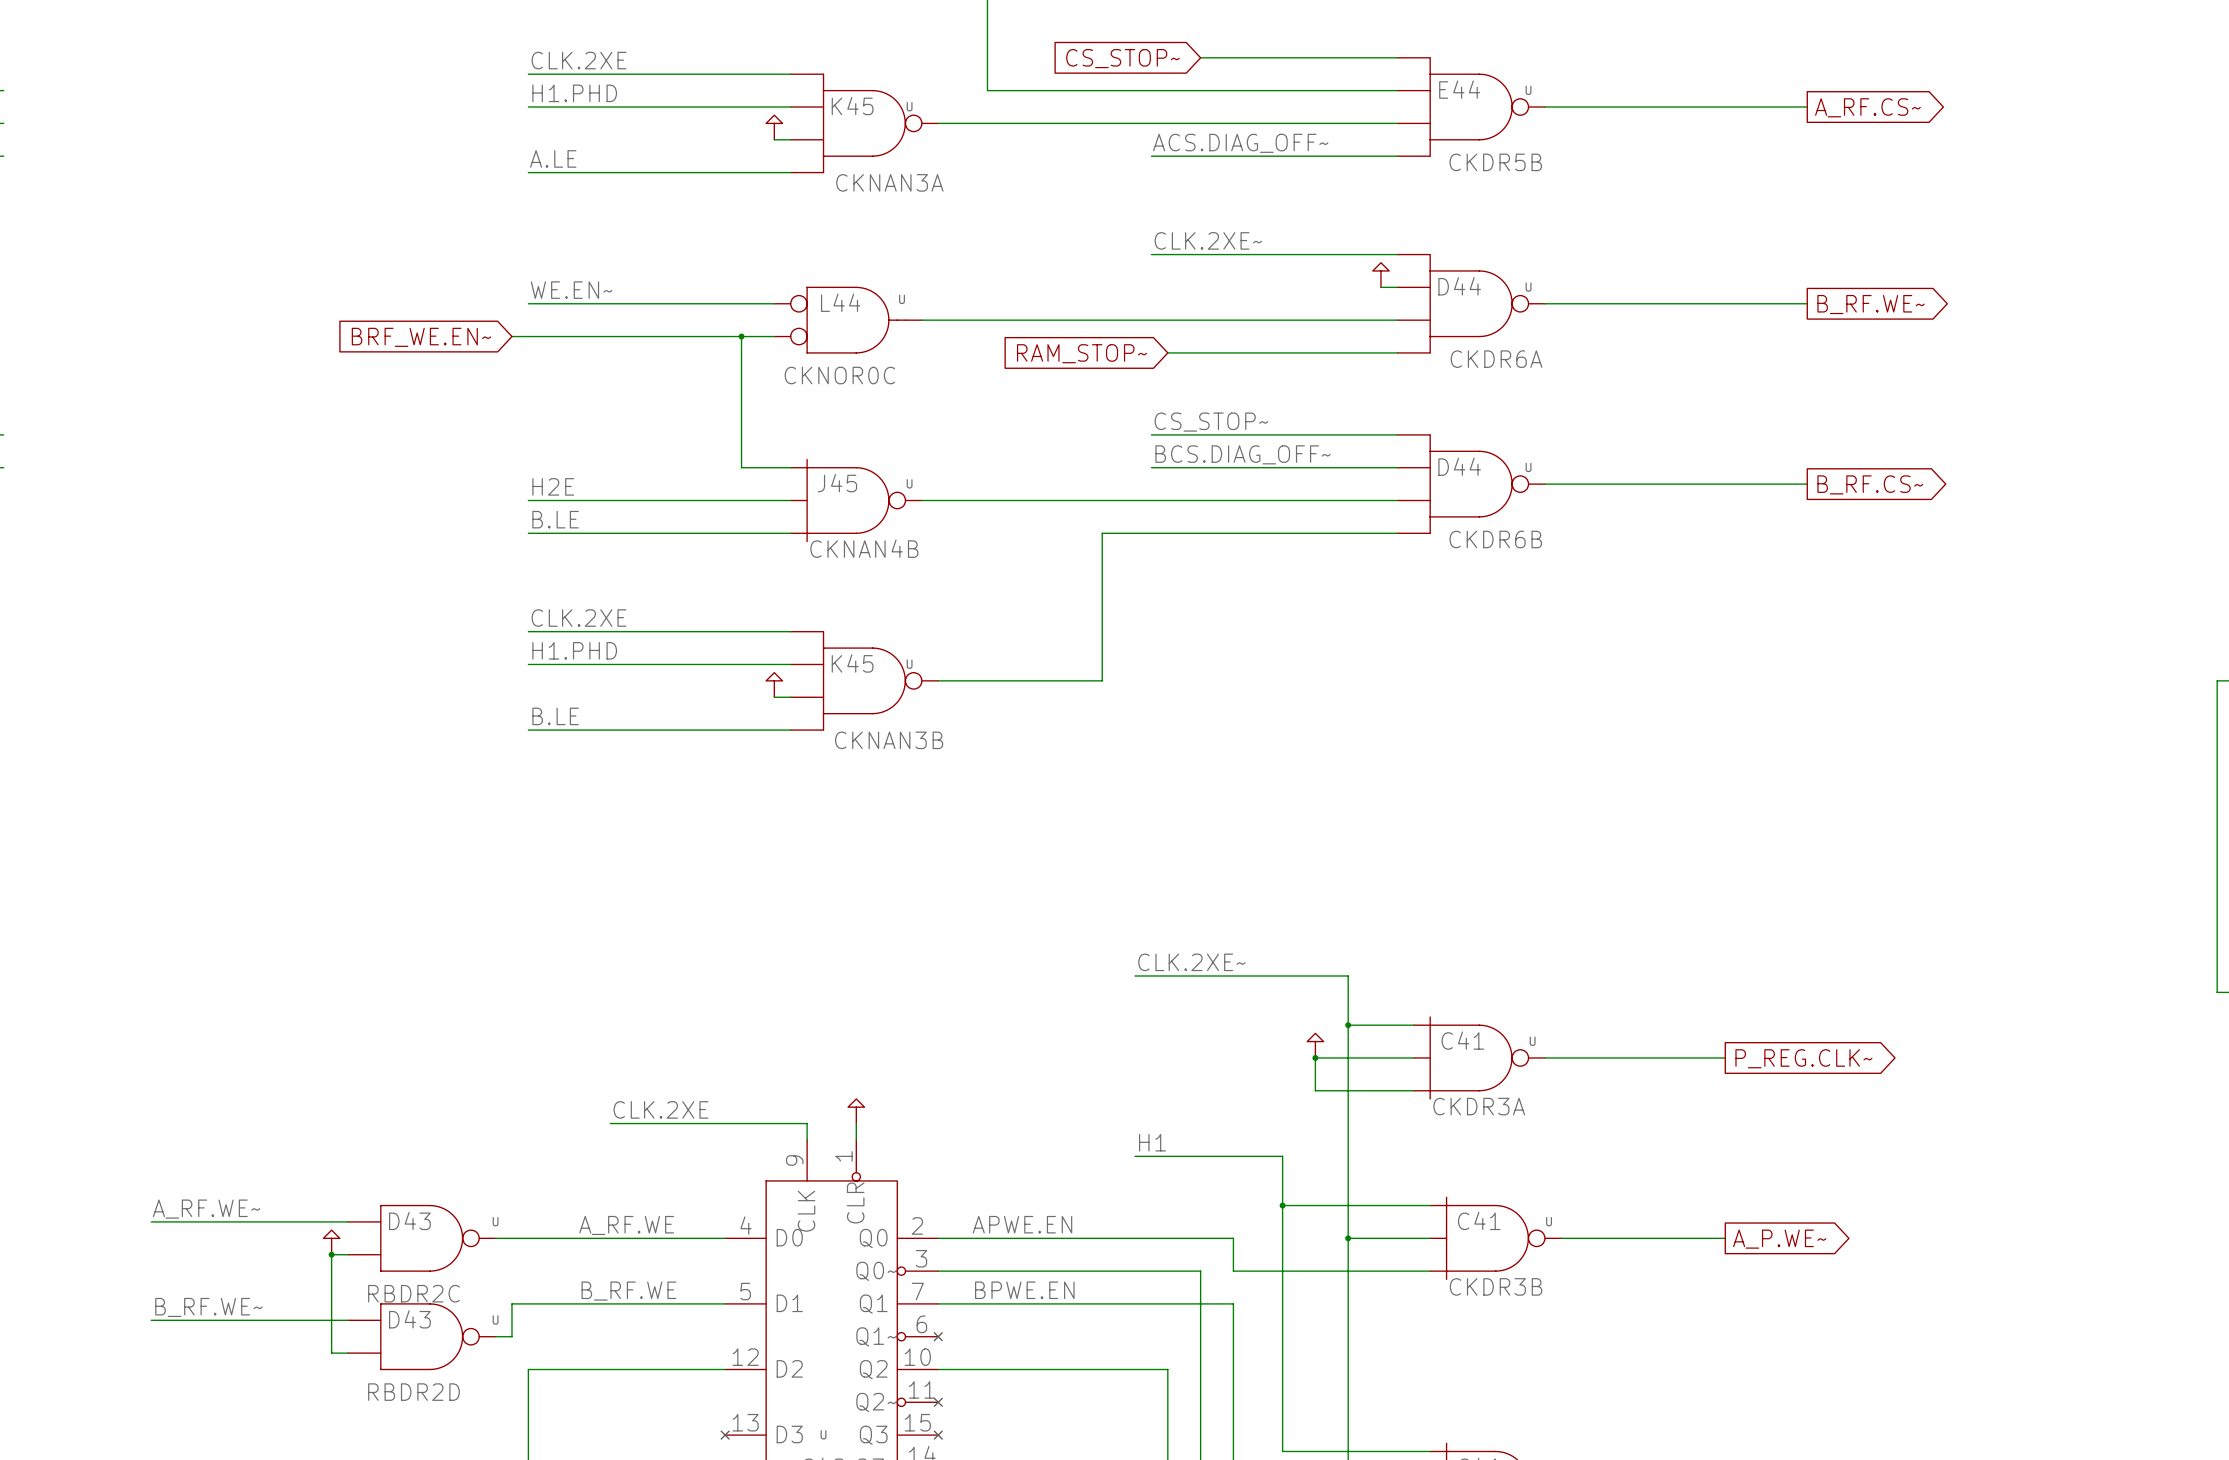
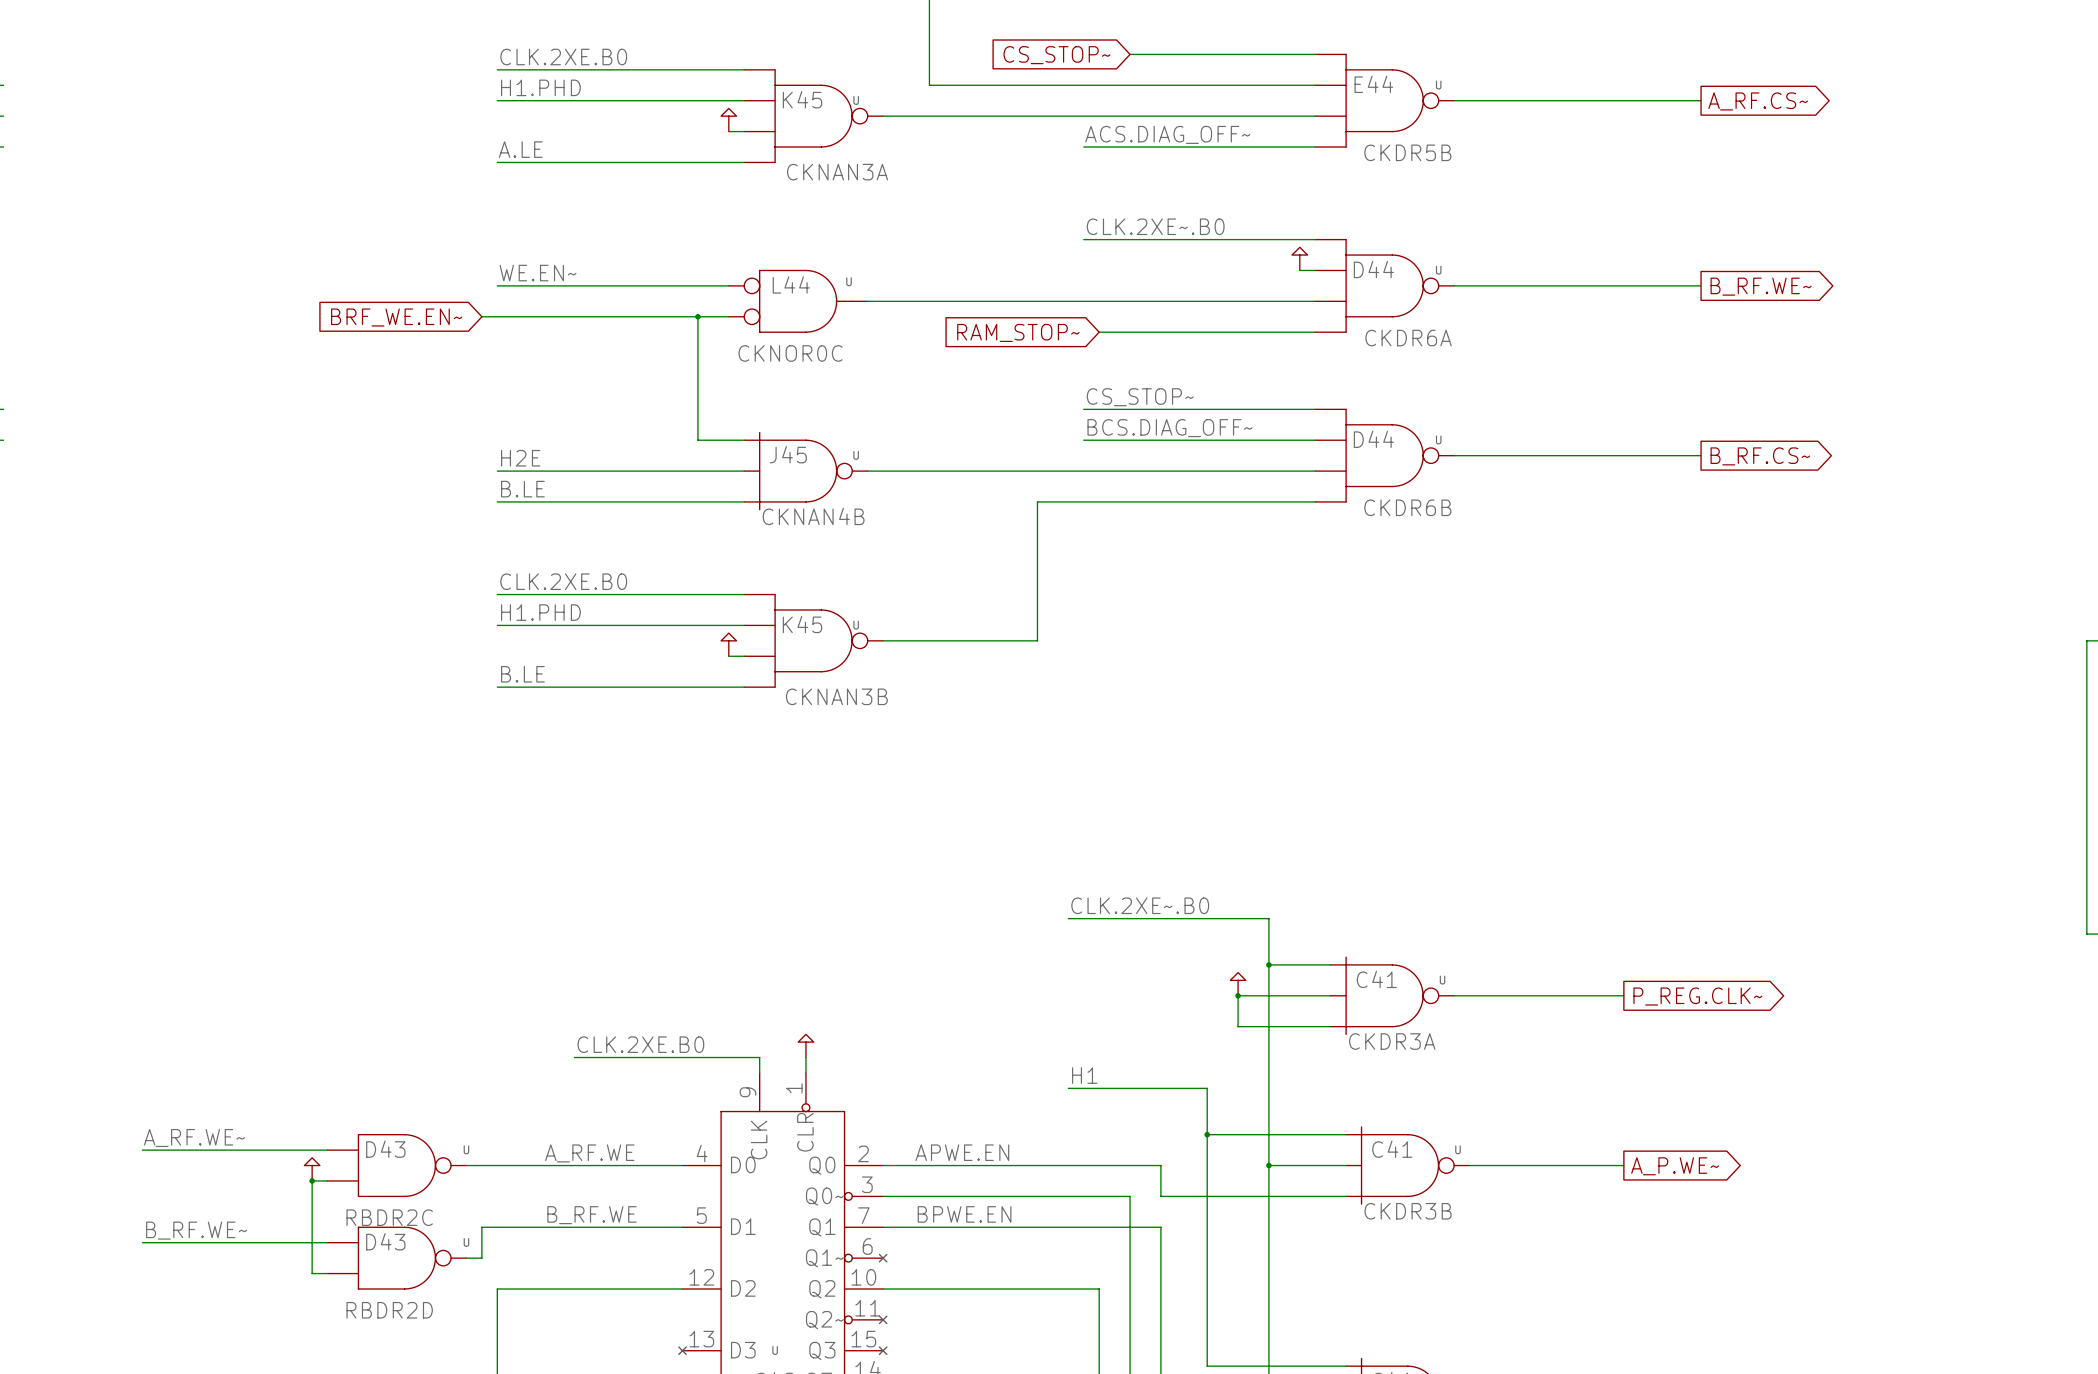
label: CLK.2XE (579, 60) -> CLK.2XE.B0 (563, 57)
label: CLK.2XE~ (1208, 240) -> CLK.2XE~.B0 (1155, 226)
label: CLK.2XE (579, 618) -> CLK.2XE.B0 (563, 581)
label: CLK.2XE~ (1191, 962) -> CLK.2XE~.B0 (1140, 905)
label: CLK.2XE (660, 1109) -> CLK.2XE.B0 (640, 1044)

